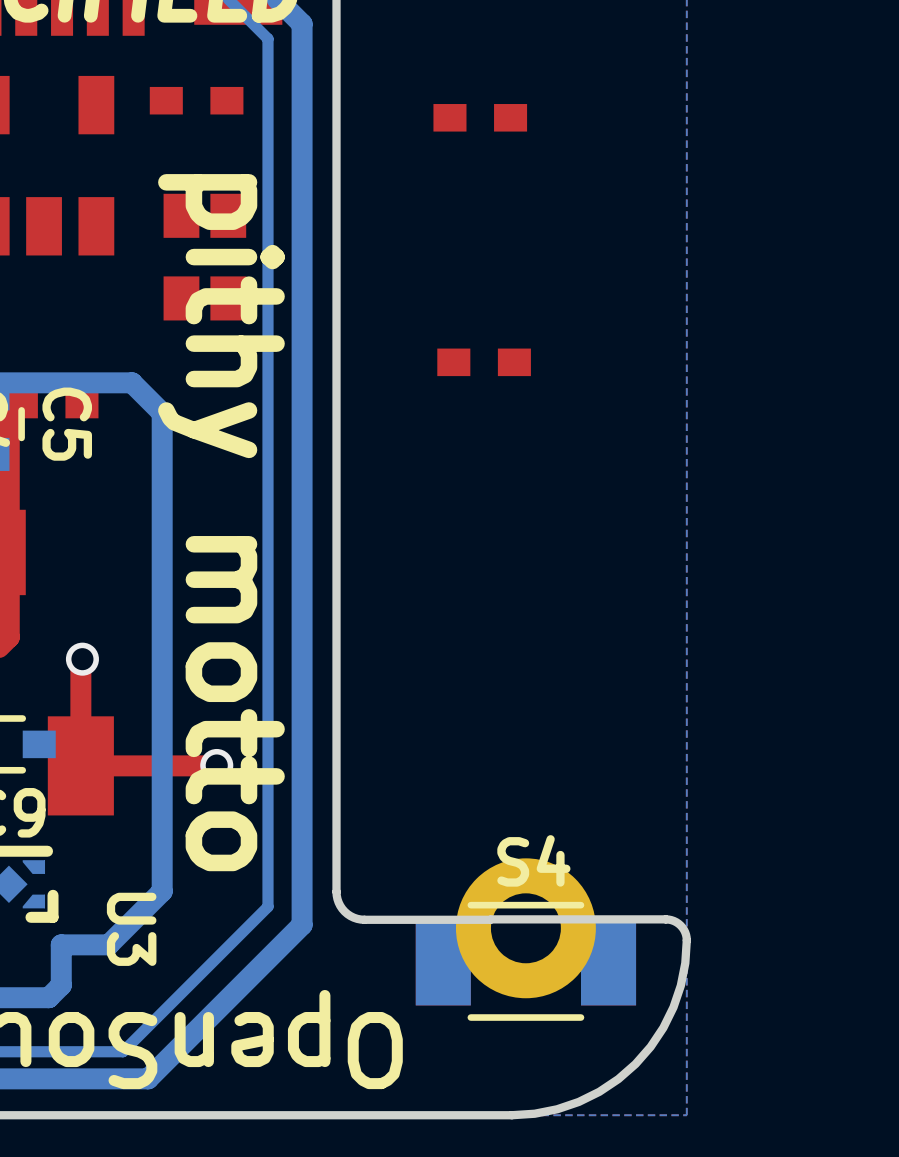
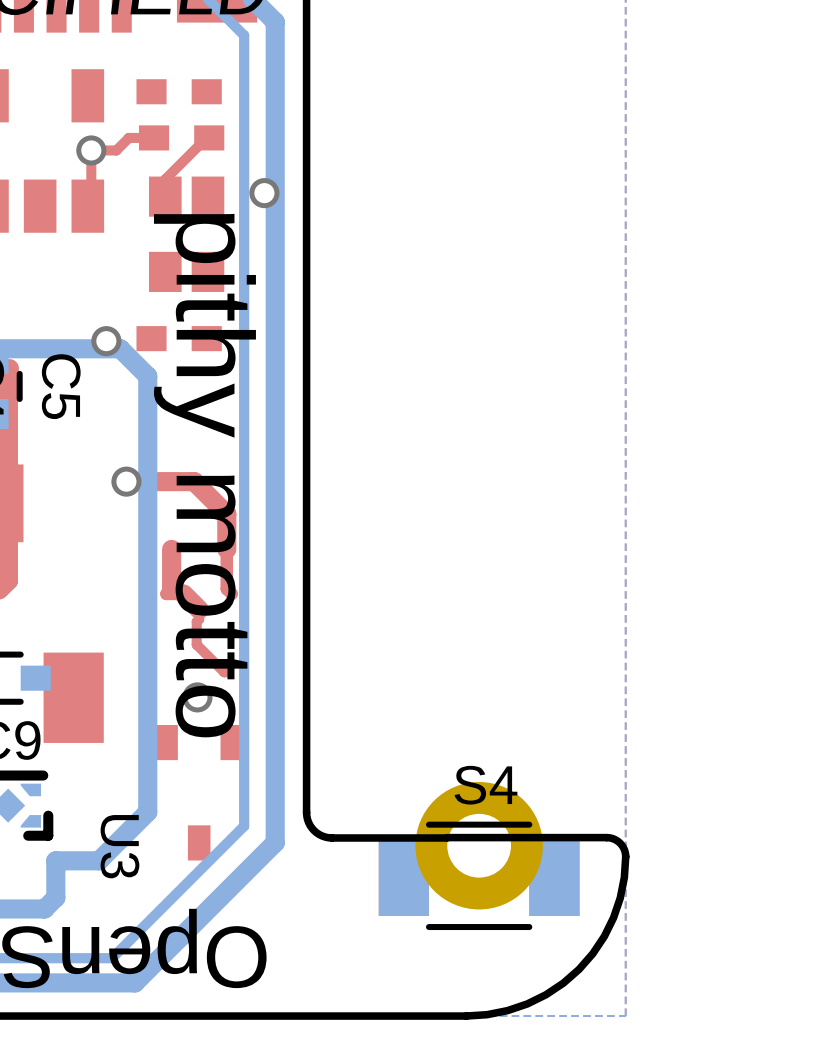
part: (480, 117) -> none
top track: none -> (154, 137) (128, 137) (116, 150) (91, 150) (91, 202) (87, 206)
part: none -> (181, 137)
top track: none -> (209, 137) (206, 137) (165, 179) (165, 196)
via: none -> (91, 150)
via: none -> (264, 193)
part: (484, 362) -> none
part: none -> (179, 338)
via: none -> (106, 341)
part: (51, 404) -> none
top track: none -> (126, 481) (194, 481) (226, 514) (226, 588) (231, 593)
top track: none -> (171, 549) (171, 588) (166, 593) (183, 593) (199, 609) (199, 619) (196, 621) (196, 644) (224, 672) (226, 672)
top track: (82, 659) (80, 660) (80, 765) (216, 765) -> none
via position: (82, 659) -> (126, 481)
part: none -> (199, 792)

